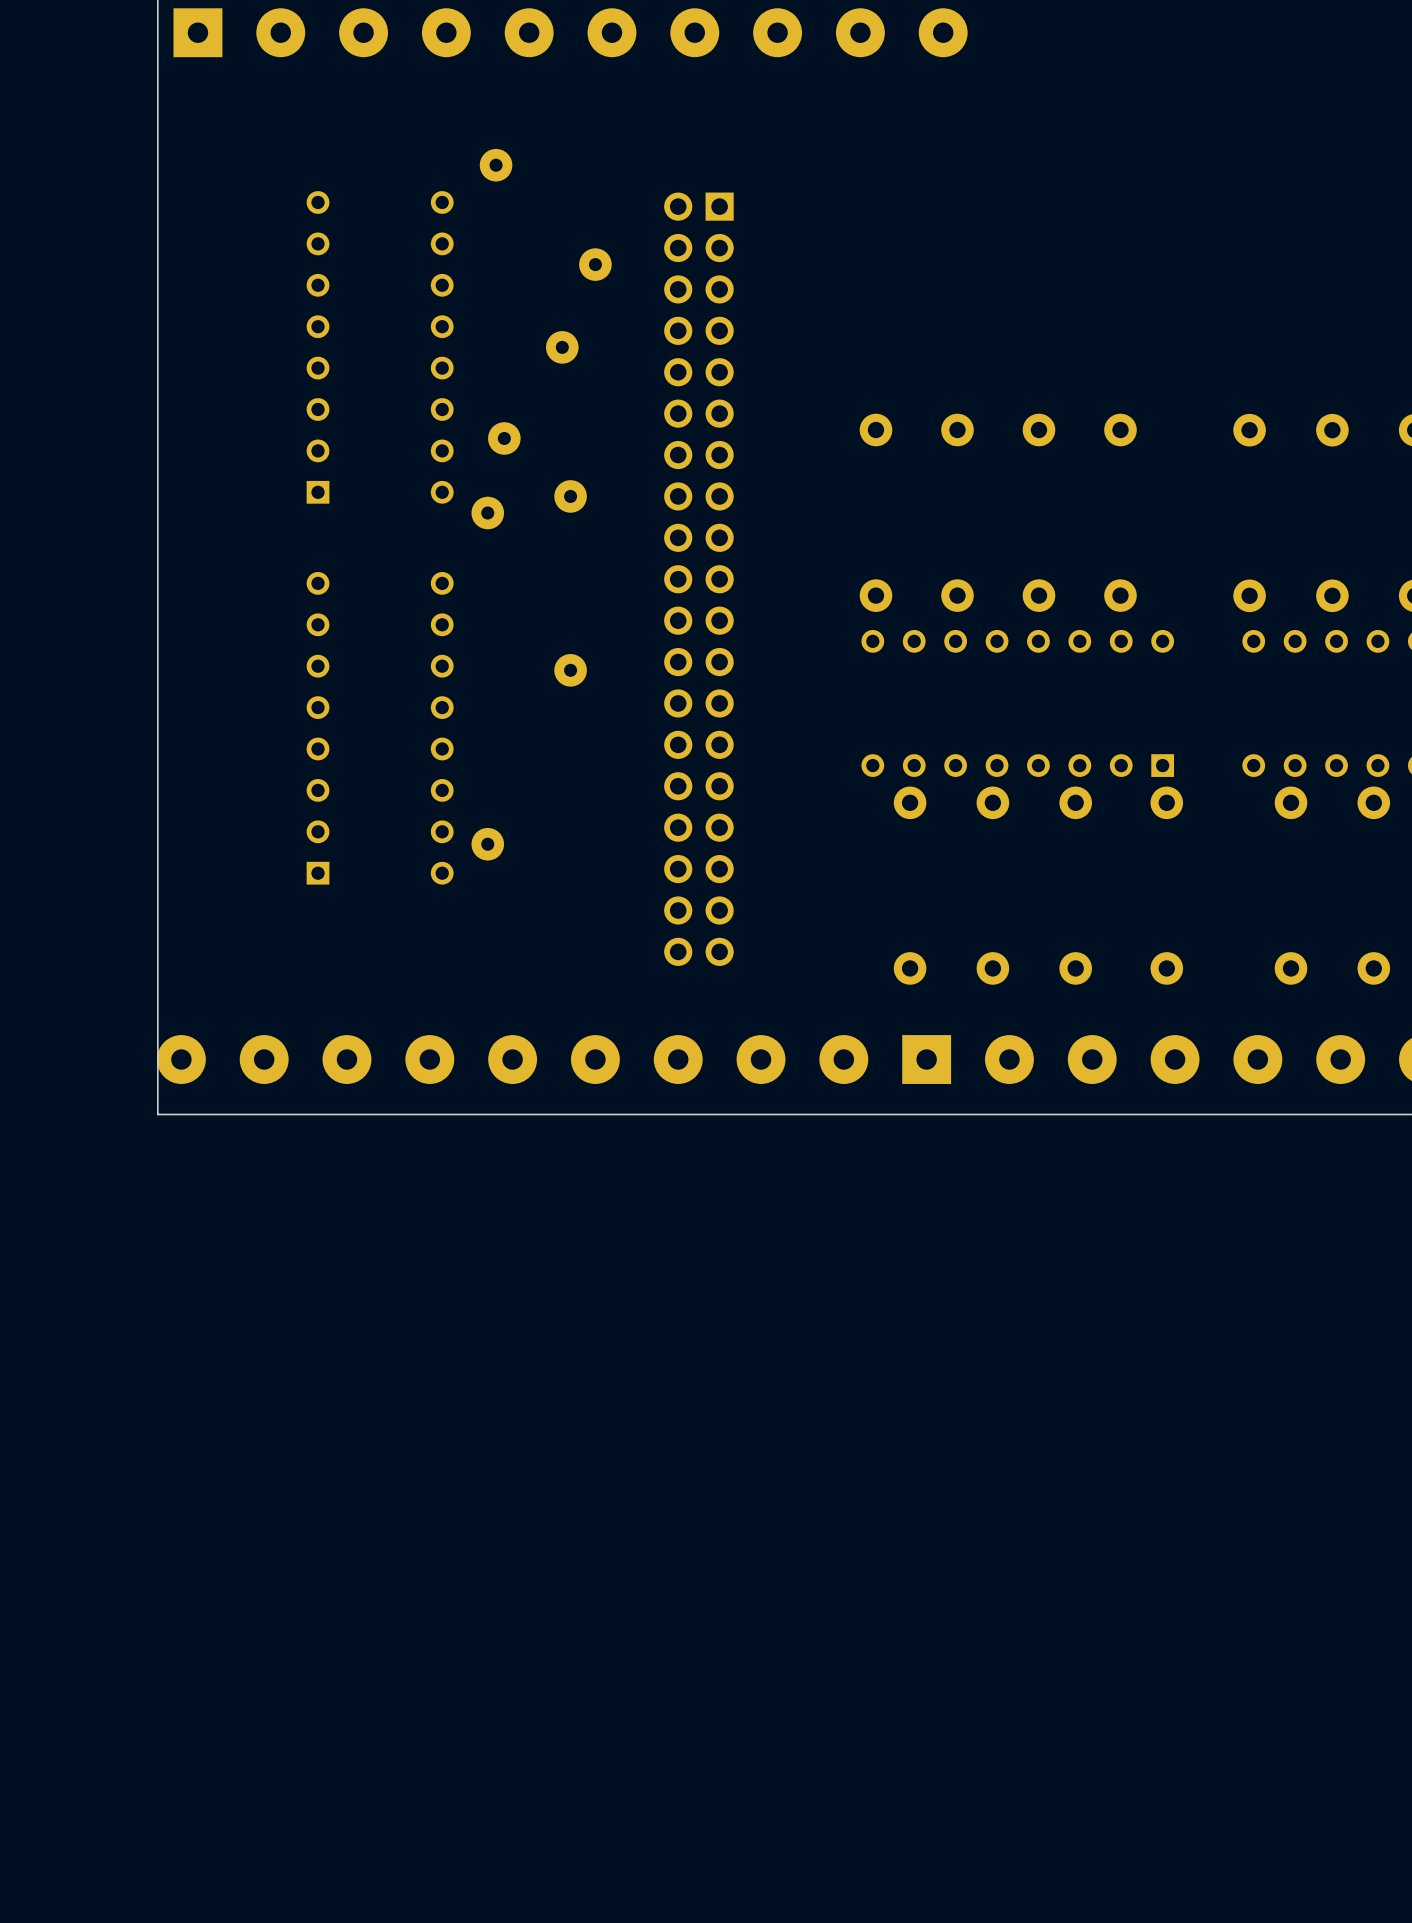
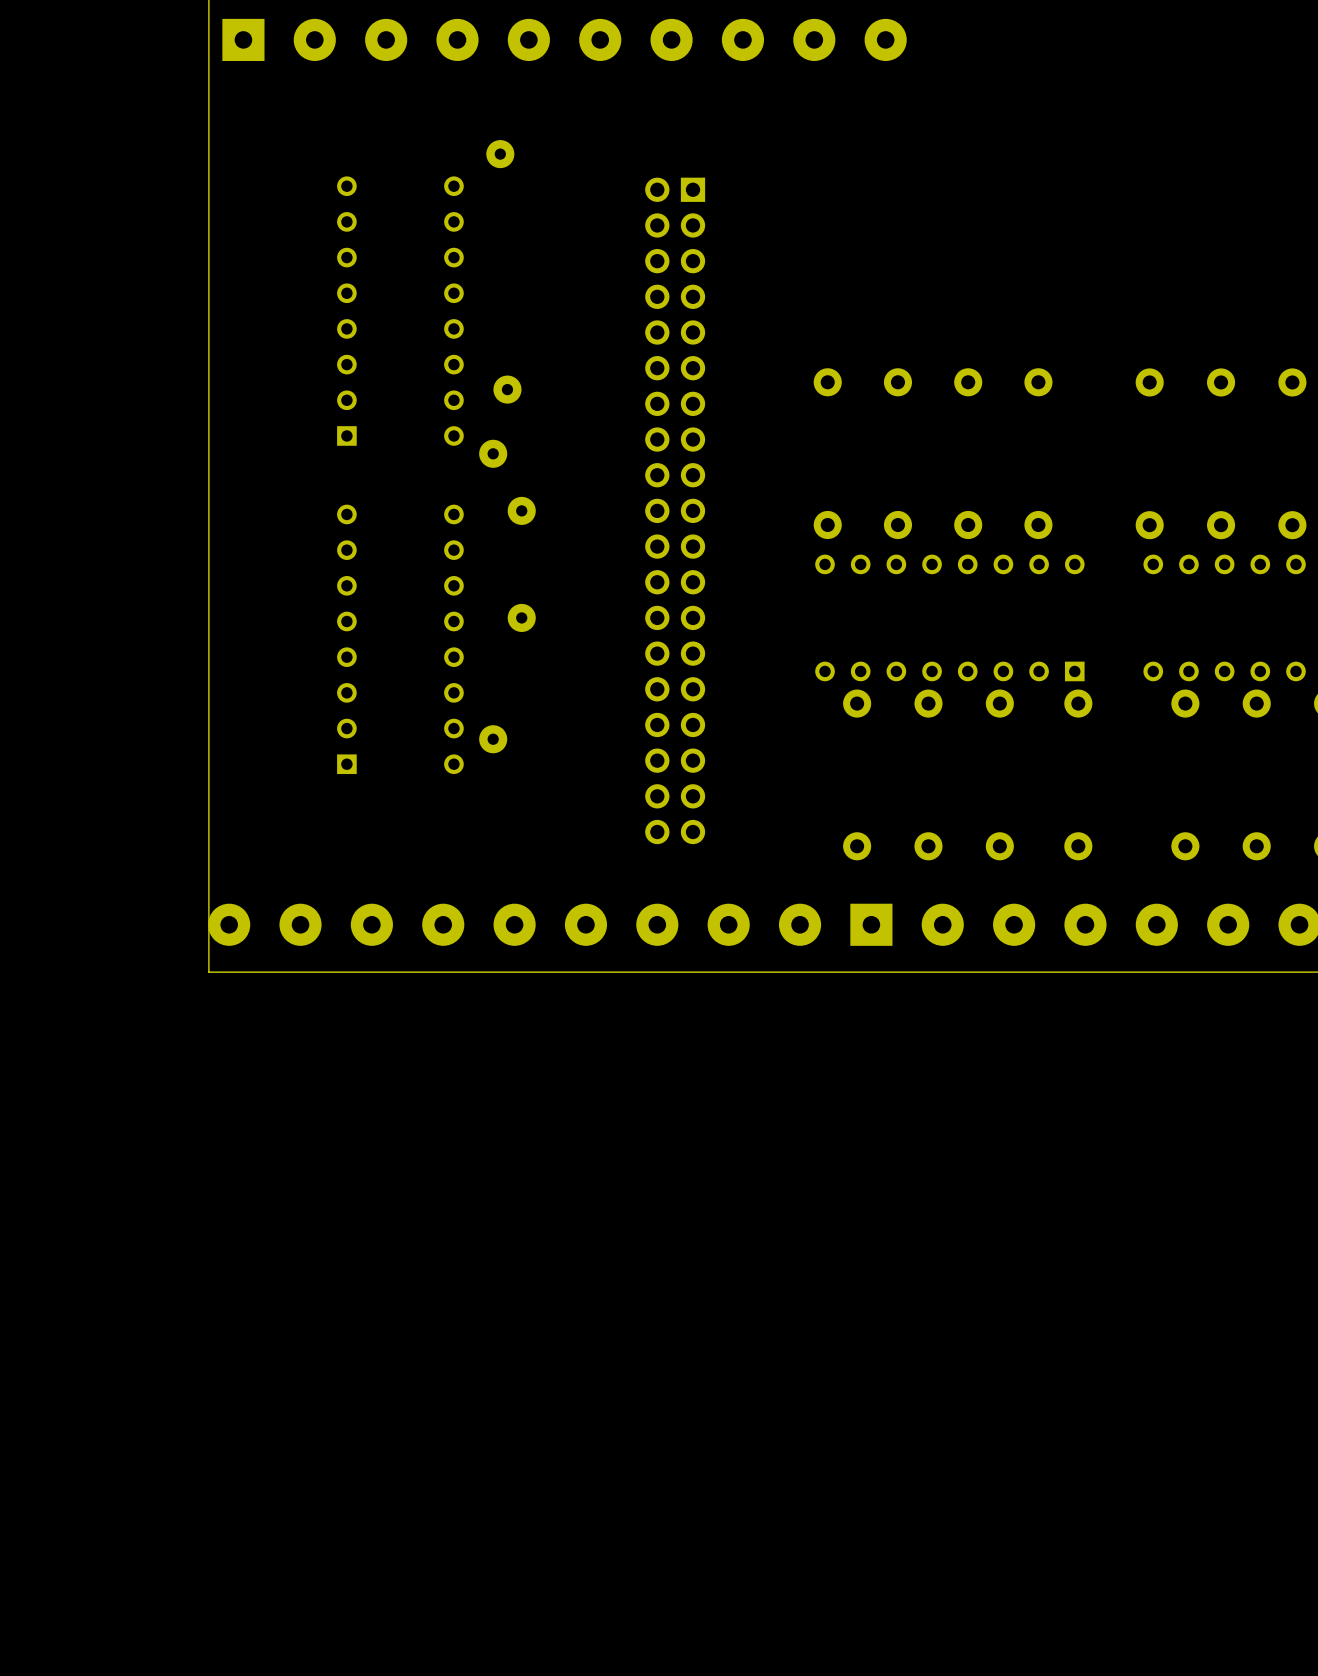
part: (595, 264) -> none
part: (562, 347) -> none
part: (570, 496) -> none
part: none -> (521, 510)
part: (570, 670) -> none
part: none -> (521, 617)

